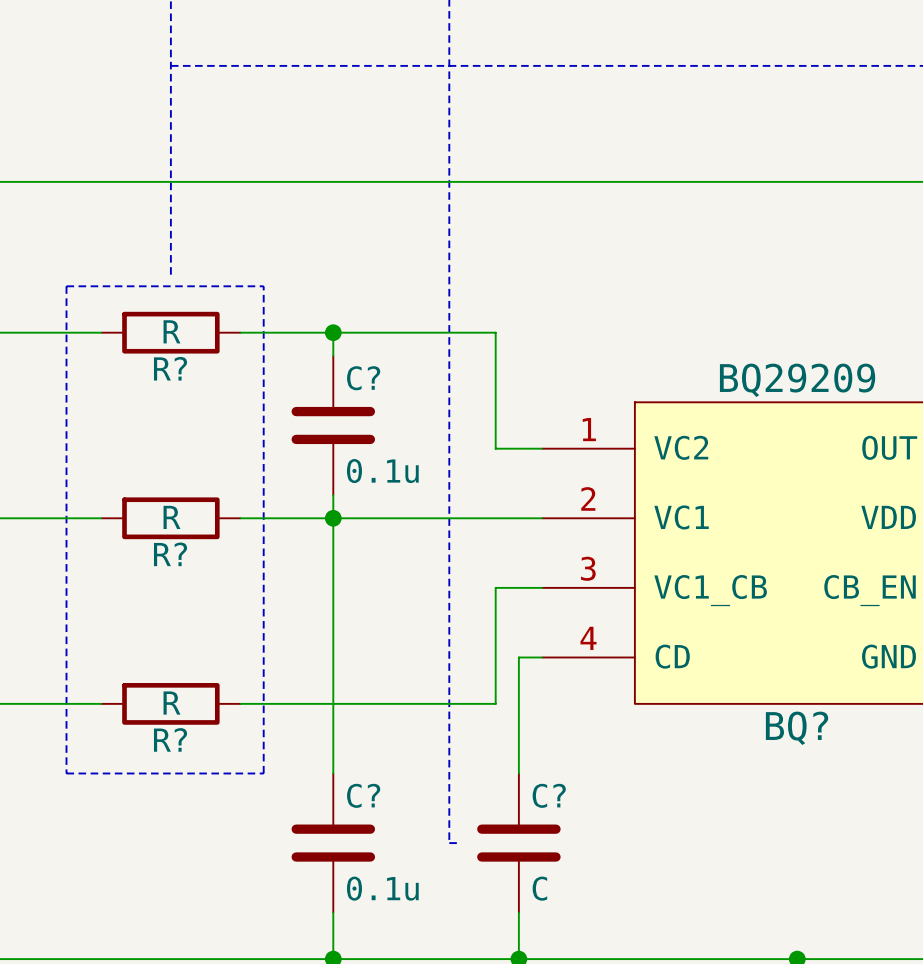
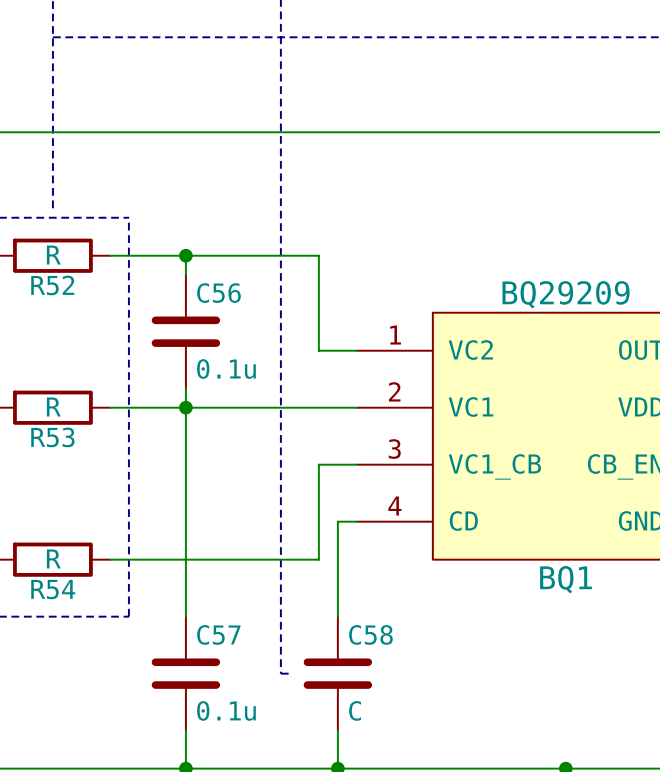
R? name: R? (170, 368) -> R52 (52, 285)
C? name: C? (363, 378) -> C56 (218, 293)
R? name: R? (170, 554) -> R53 (52, 437)
BQ? name: BQ? (797, 728) -> BQ1 (566, 579)
R? name: R? (170, 739) -> R54 (53, 589)
C? name: C? (363, 795) -> C57 (218, 634)
C? name: C? (549, 795) -> C58 (370, 634)

